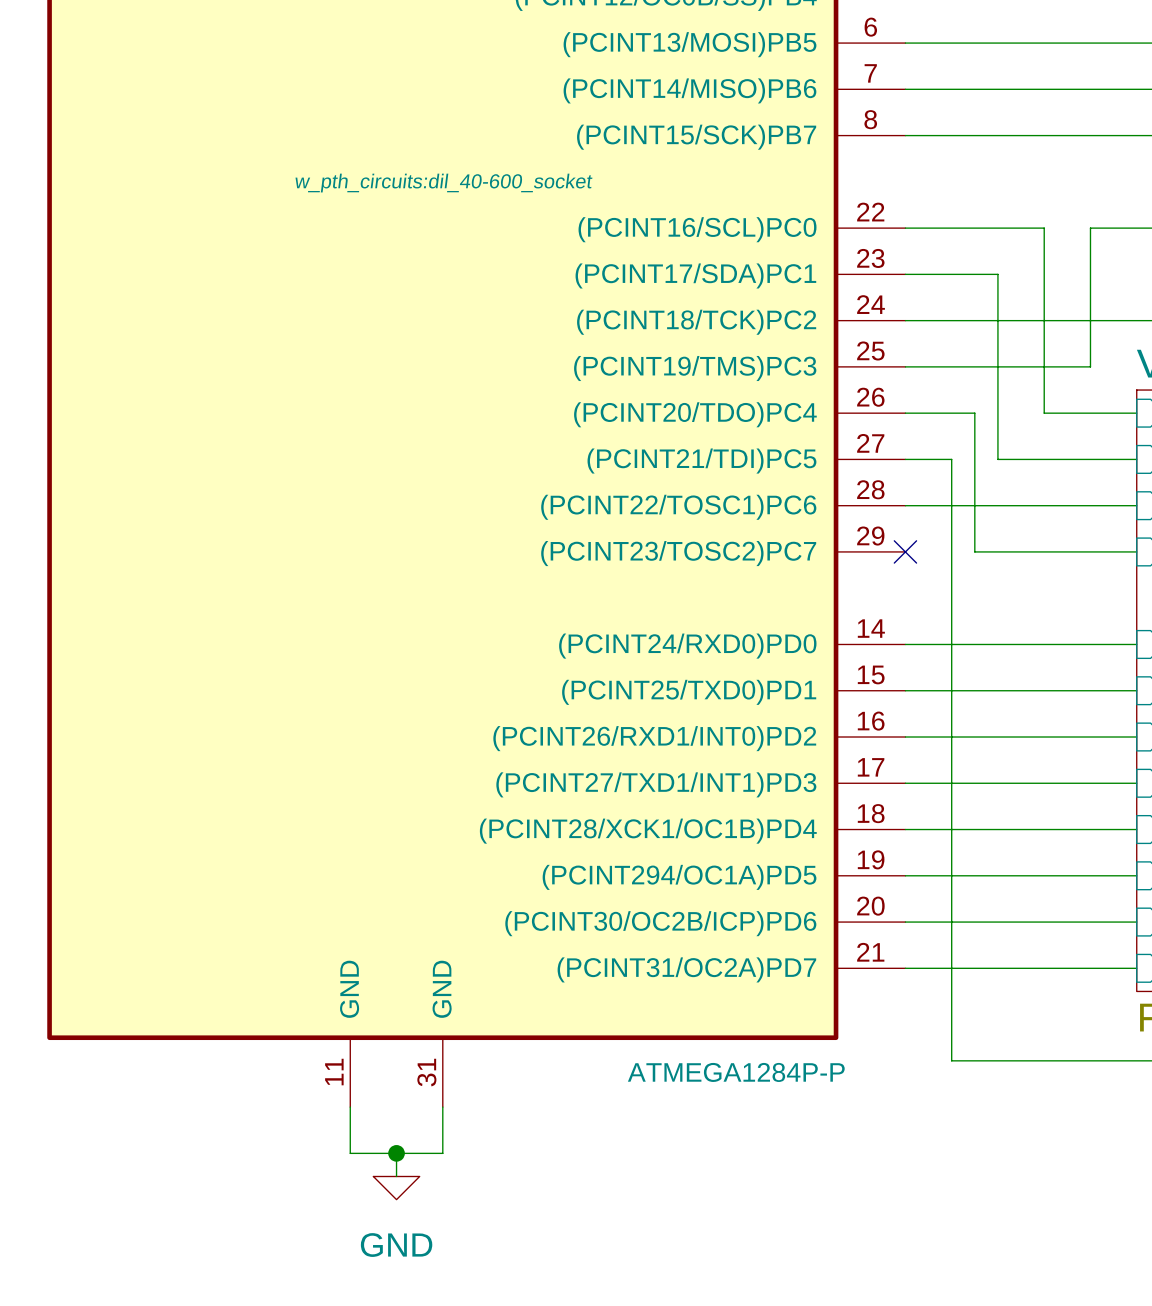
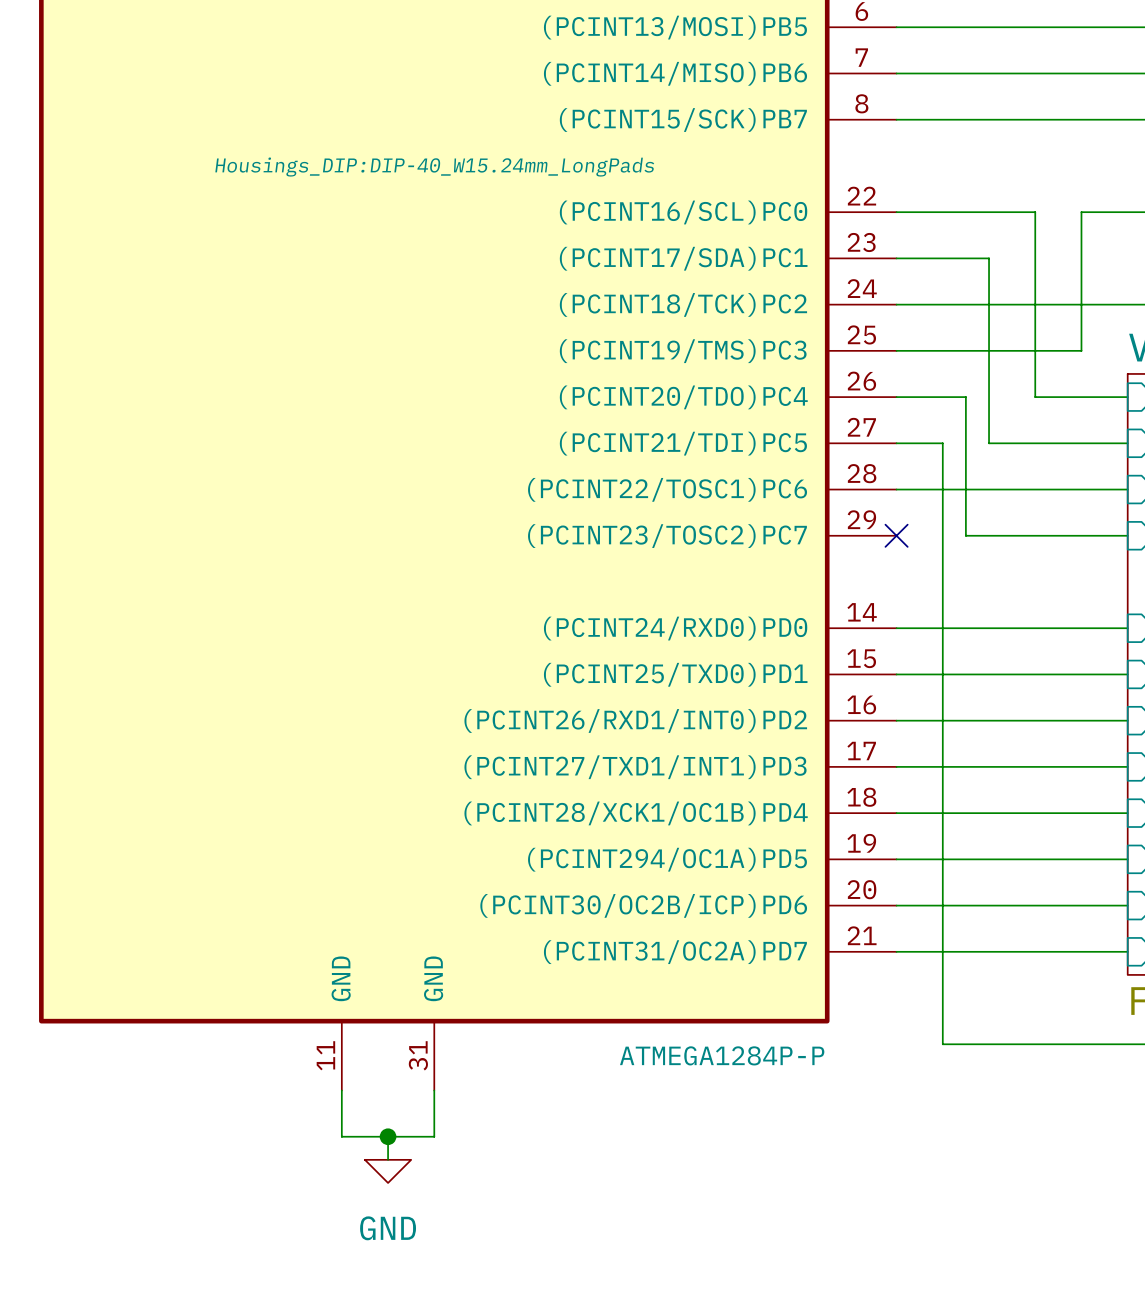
part text: w_pth_circuits:dil_40-600_socket (443, 183) -> Housings_DIP:DIP-40_W15.24mm_LongPads (434, 167)

